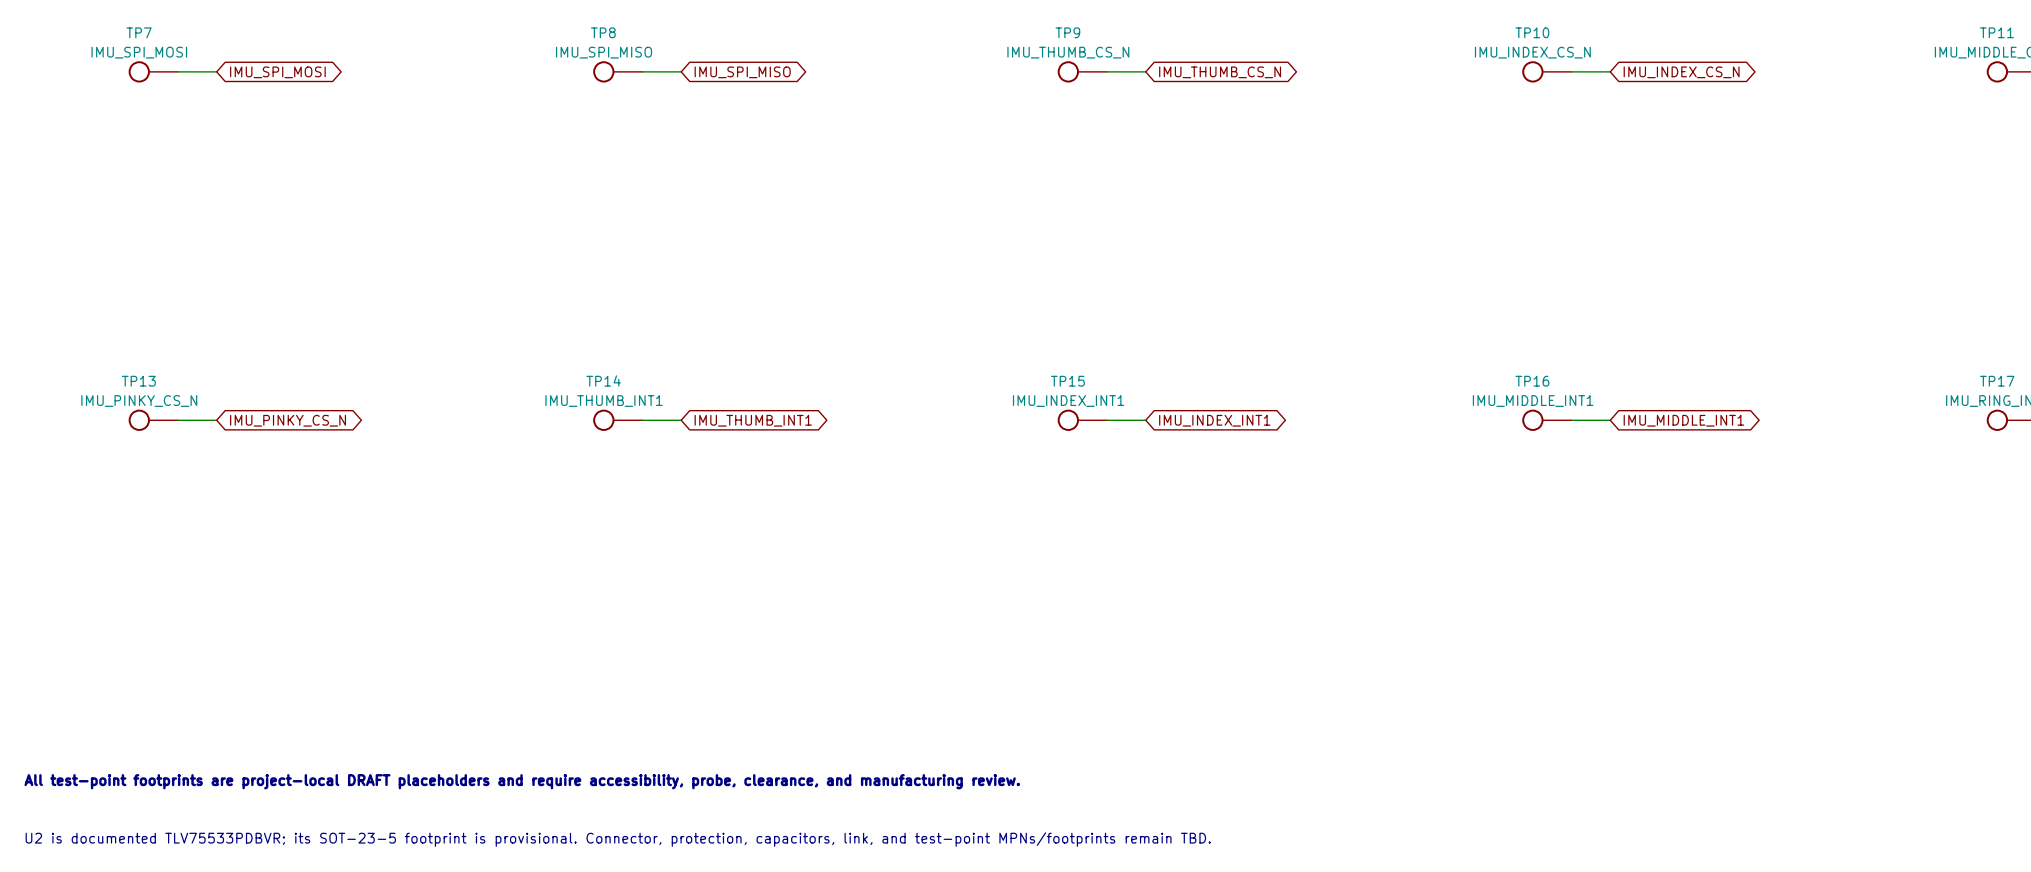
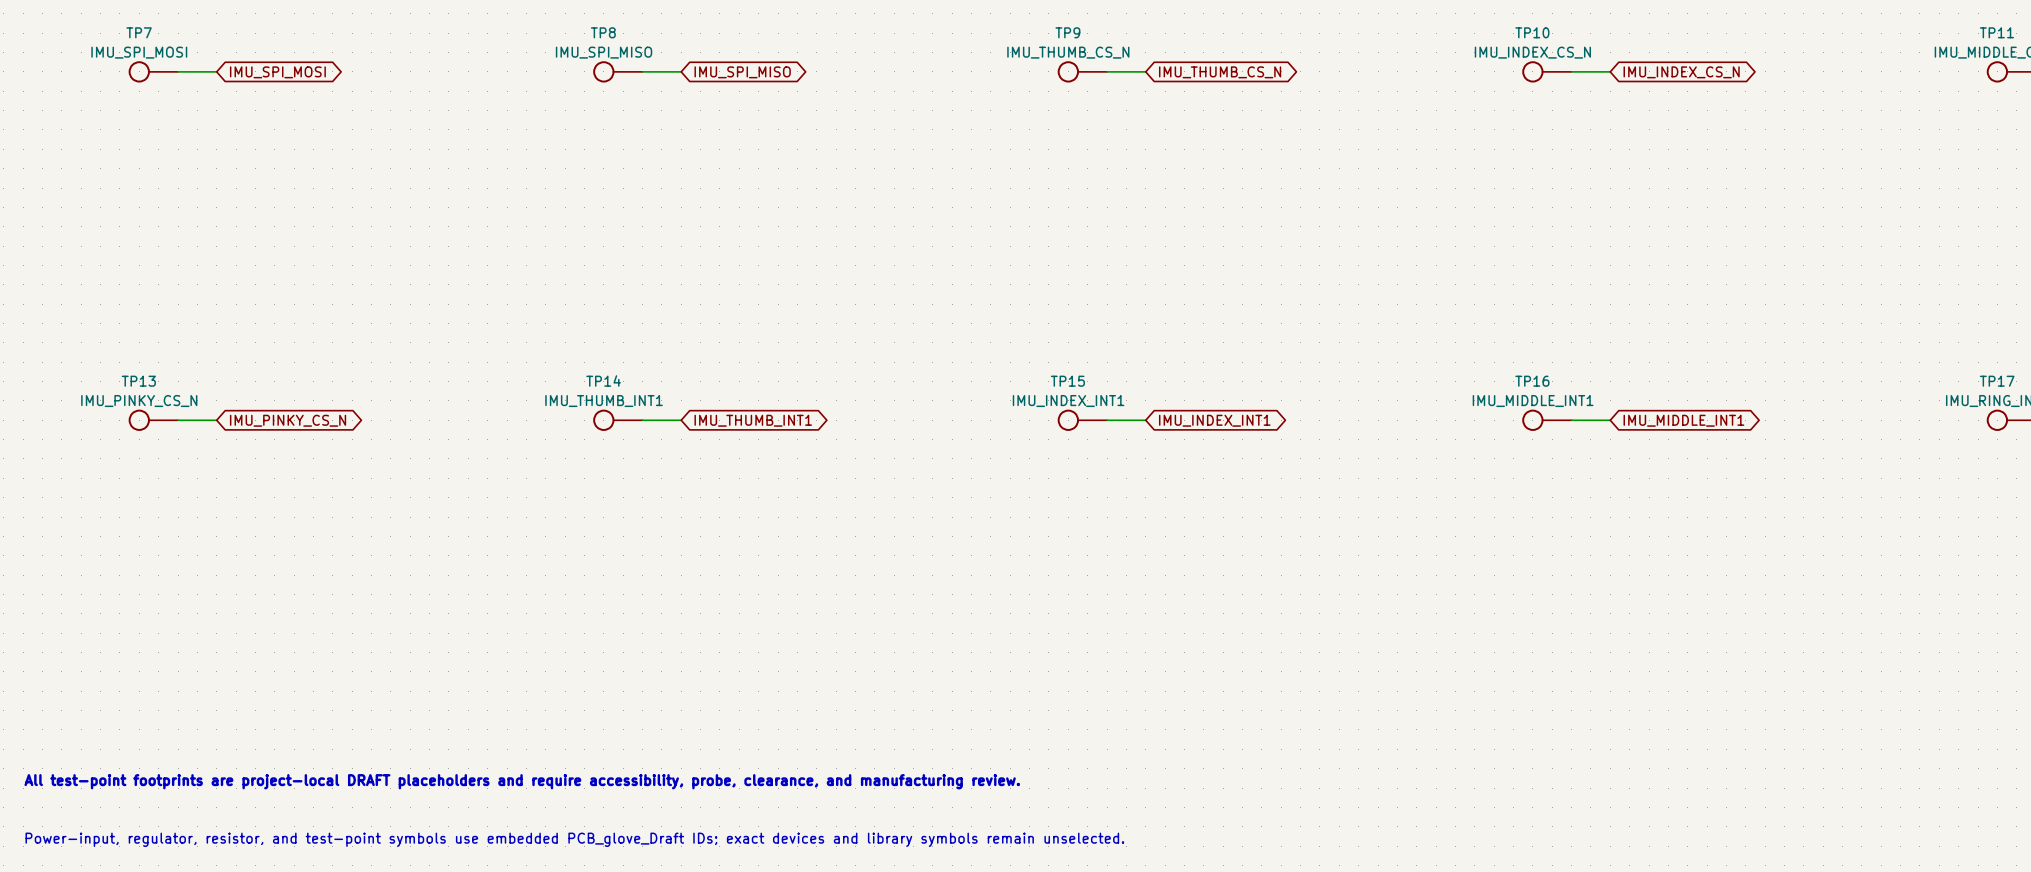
text: U2 is documented TLV75533PDBVR; its SOT-23-5 footprint is provisional. Connector, protection, capacitors, link, and test-point MPNs/footprints remain TBD. (618, 839) -> Power-input, regulator, resistor, and test-point symbols use embedded PCB_glove_Draft IDs; exact devices and library symbols remain unselected. (574, 839)

